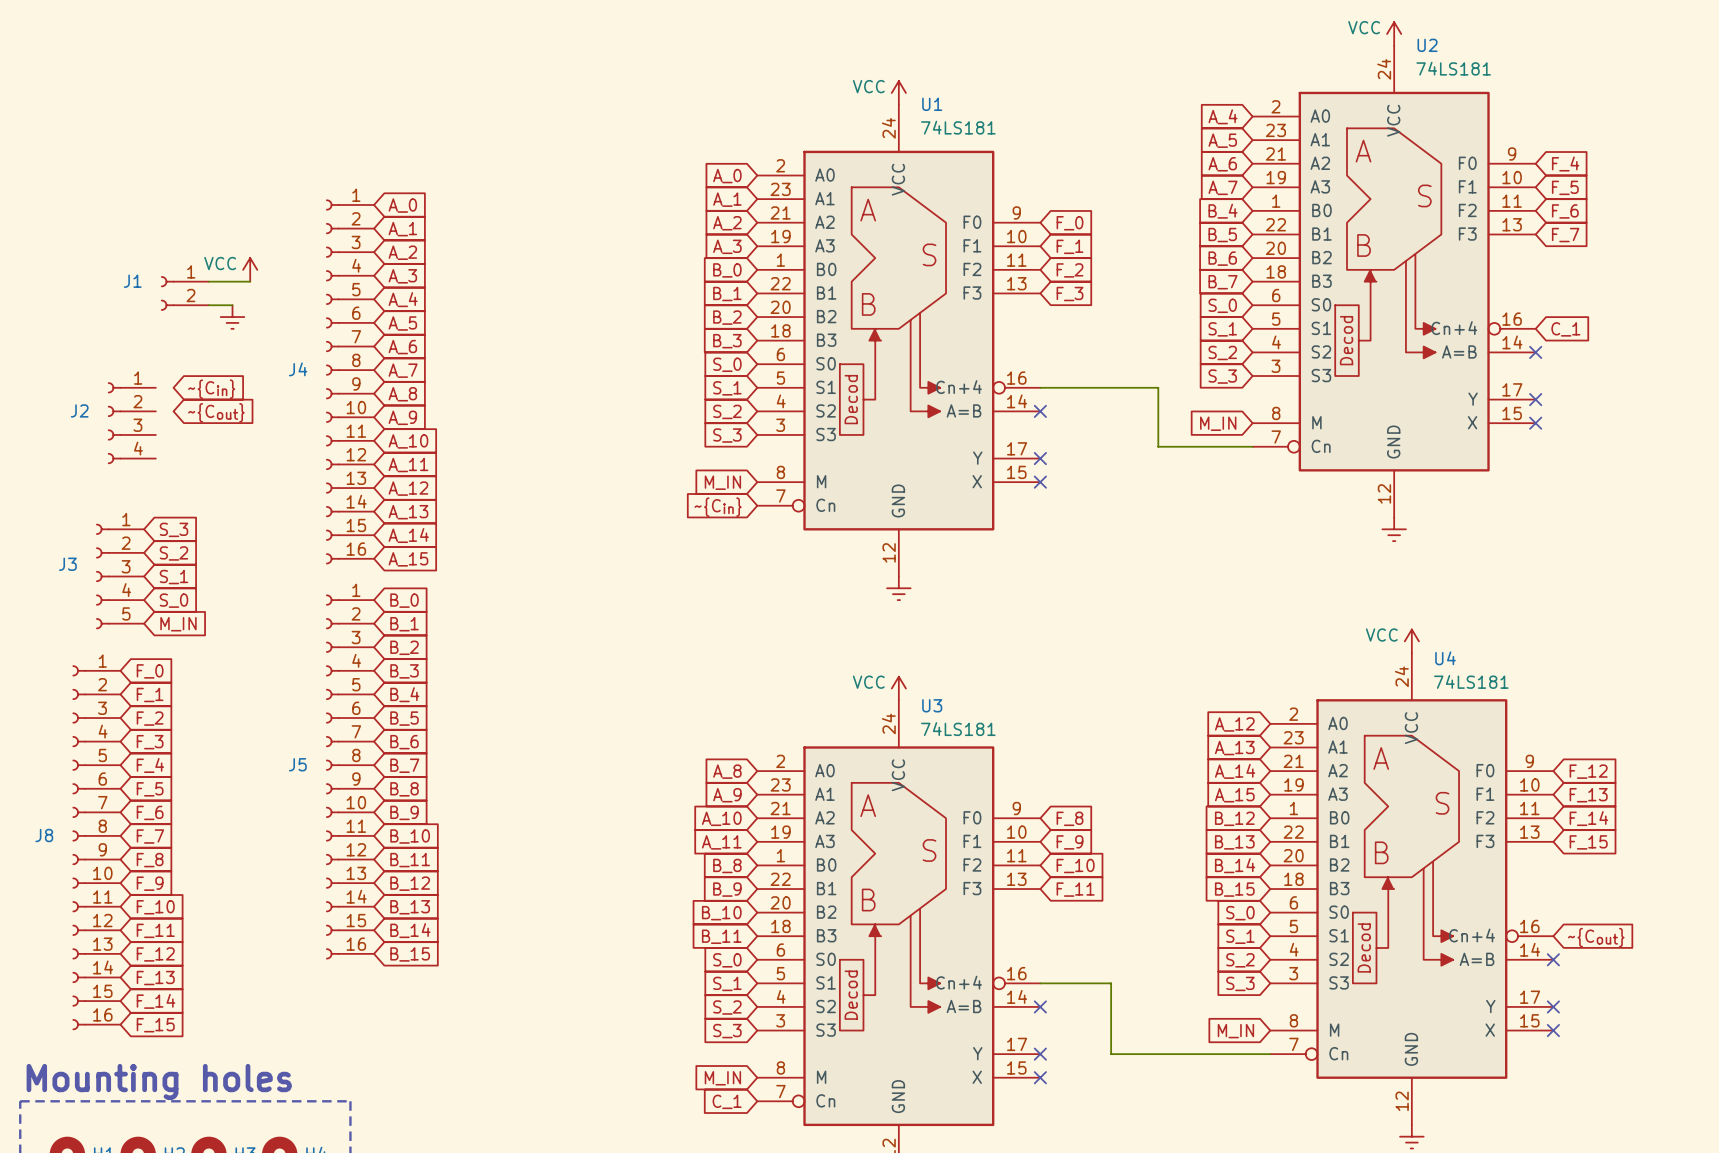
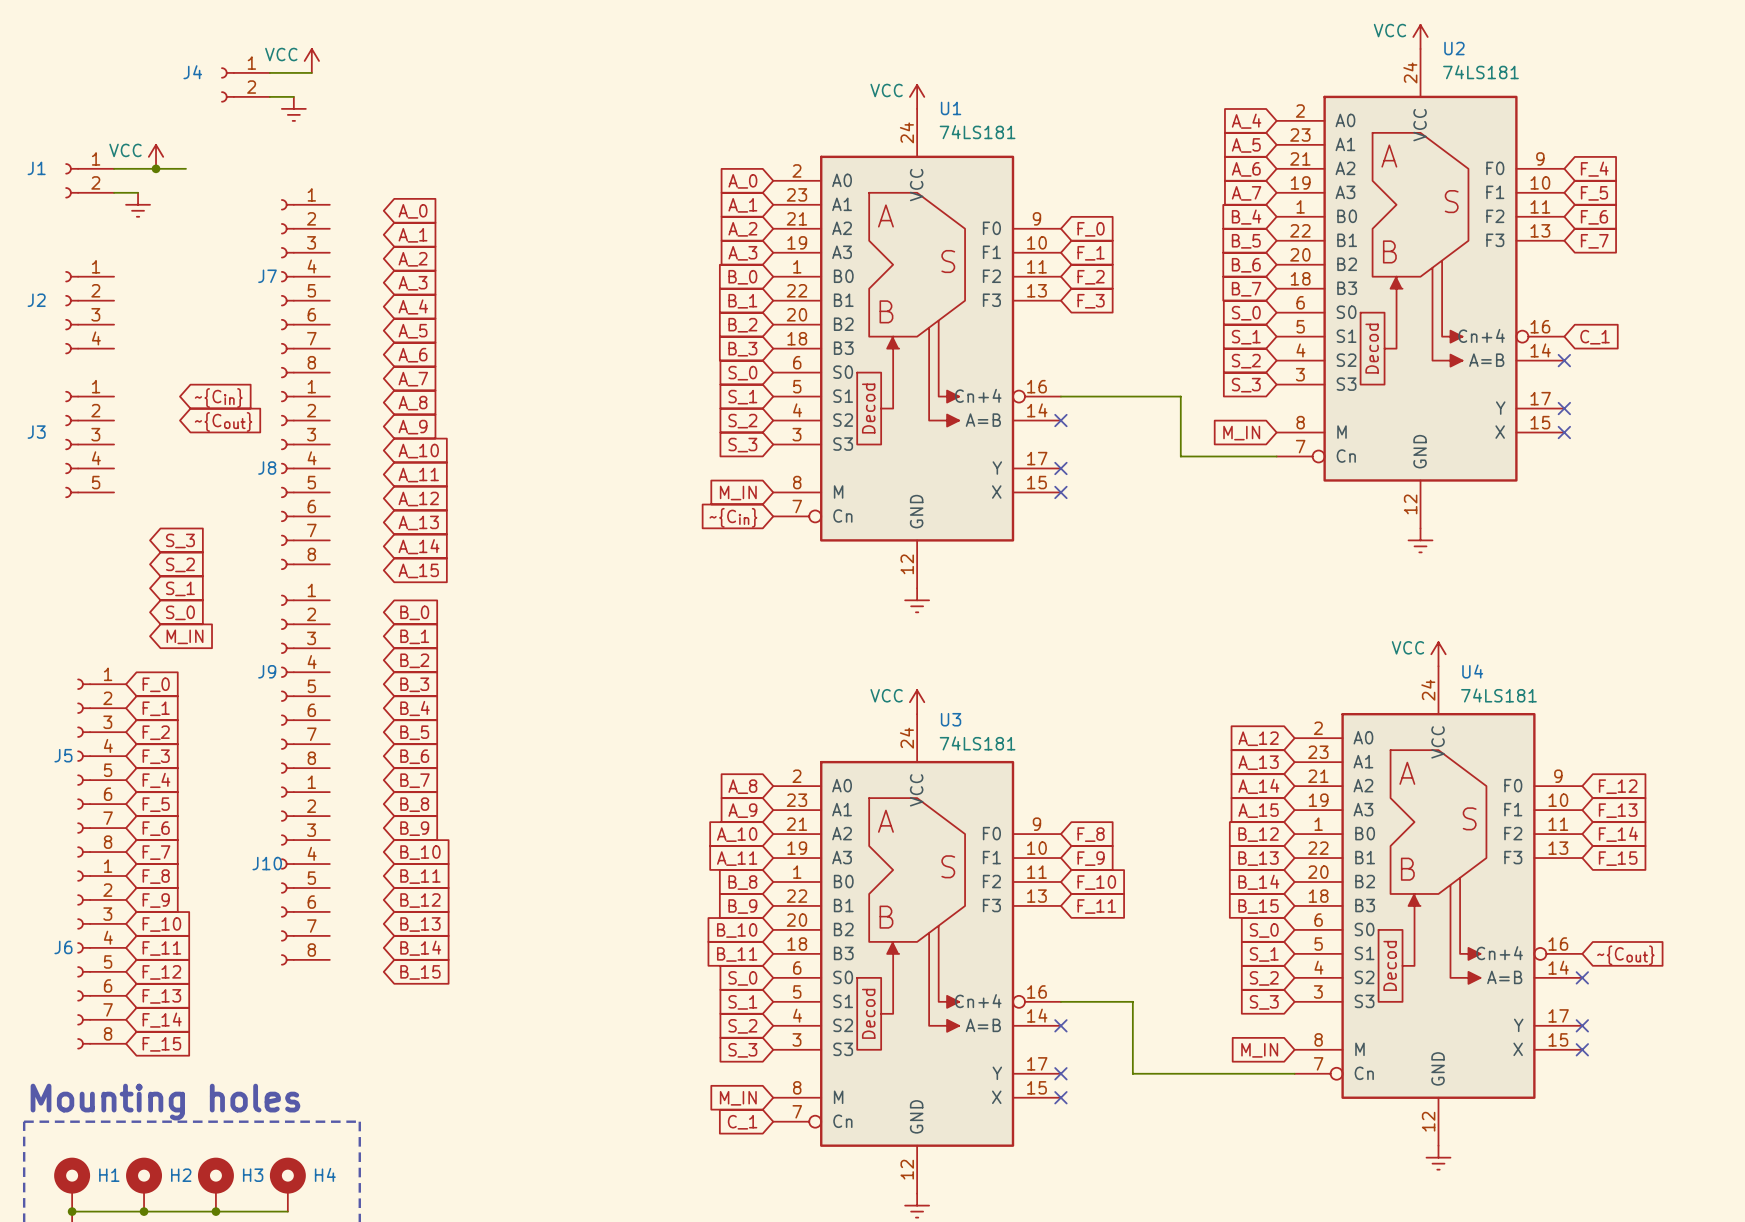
power symbol: none -> VCC (311, 60)
power symbol: none -> (293, 108)
power symbol: none -> VCC (156, 156)
wire: none -> (114, 168) (185, 168)
junction: none -> (156, 168)
wire: none -> (114, 192) (138, 192)
power symbol: none -> (138, 204)
J4 symbol: [326, 199, 375, 565] -> [221, 67, 270, 103]
power symbol: VCC (250, 269) -> none
wire: (208, 281) (250, 281) -> (269, 72) (311, 72)
J7: none -> (305, 288)
J1 position: (184, 293) -> (89, 180)
wire: (208, 305) (232, 305) -> (269, 96) (293, 96)
power symbol: (232, 317) -> none
J2 position: (131, 423) -> (89, 312)
J3 position: (120, 576) -> (89, 444)
J5 symbol: [326, 594, 375, 960] -> [77, 678, 127, 858]
J8 symbol: [72, 665, 121, 1031] -> [281, 391, 330, 570]
J9: none -> (305, 684)
J10: none -> (305, 875)
J6: none -> (101, 959)

